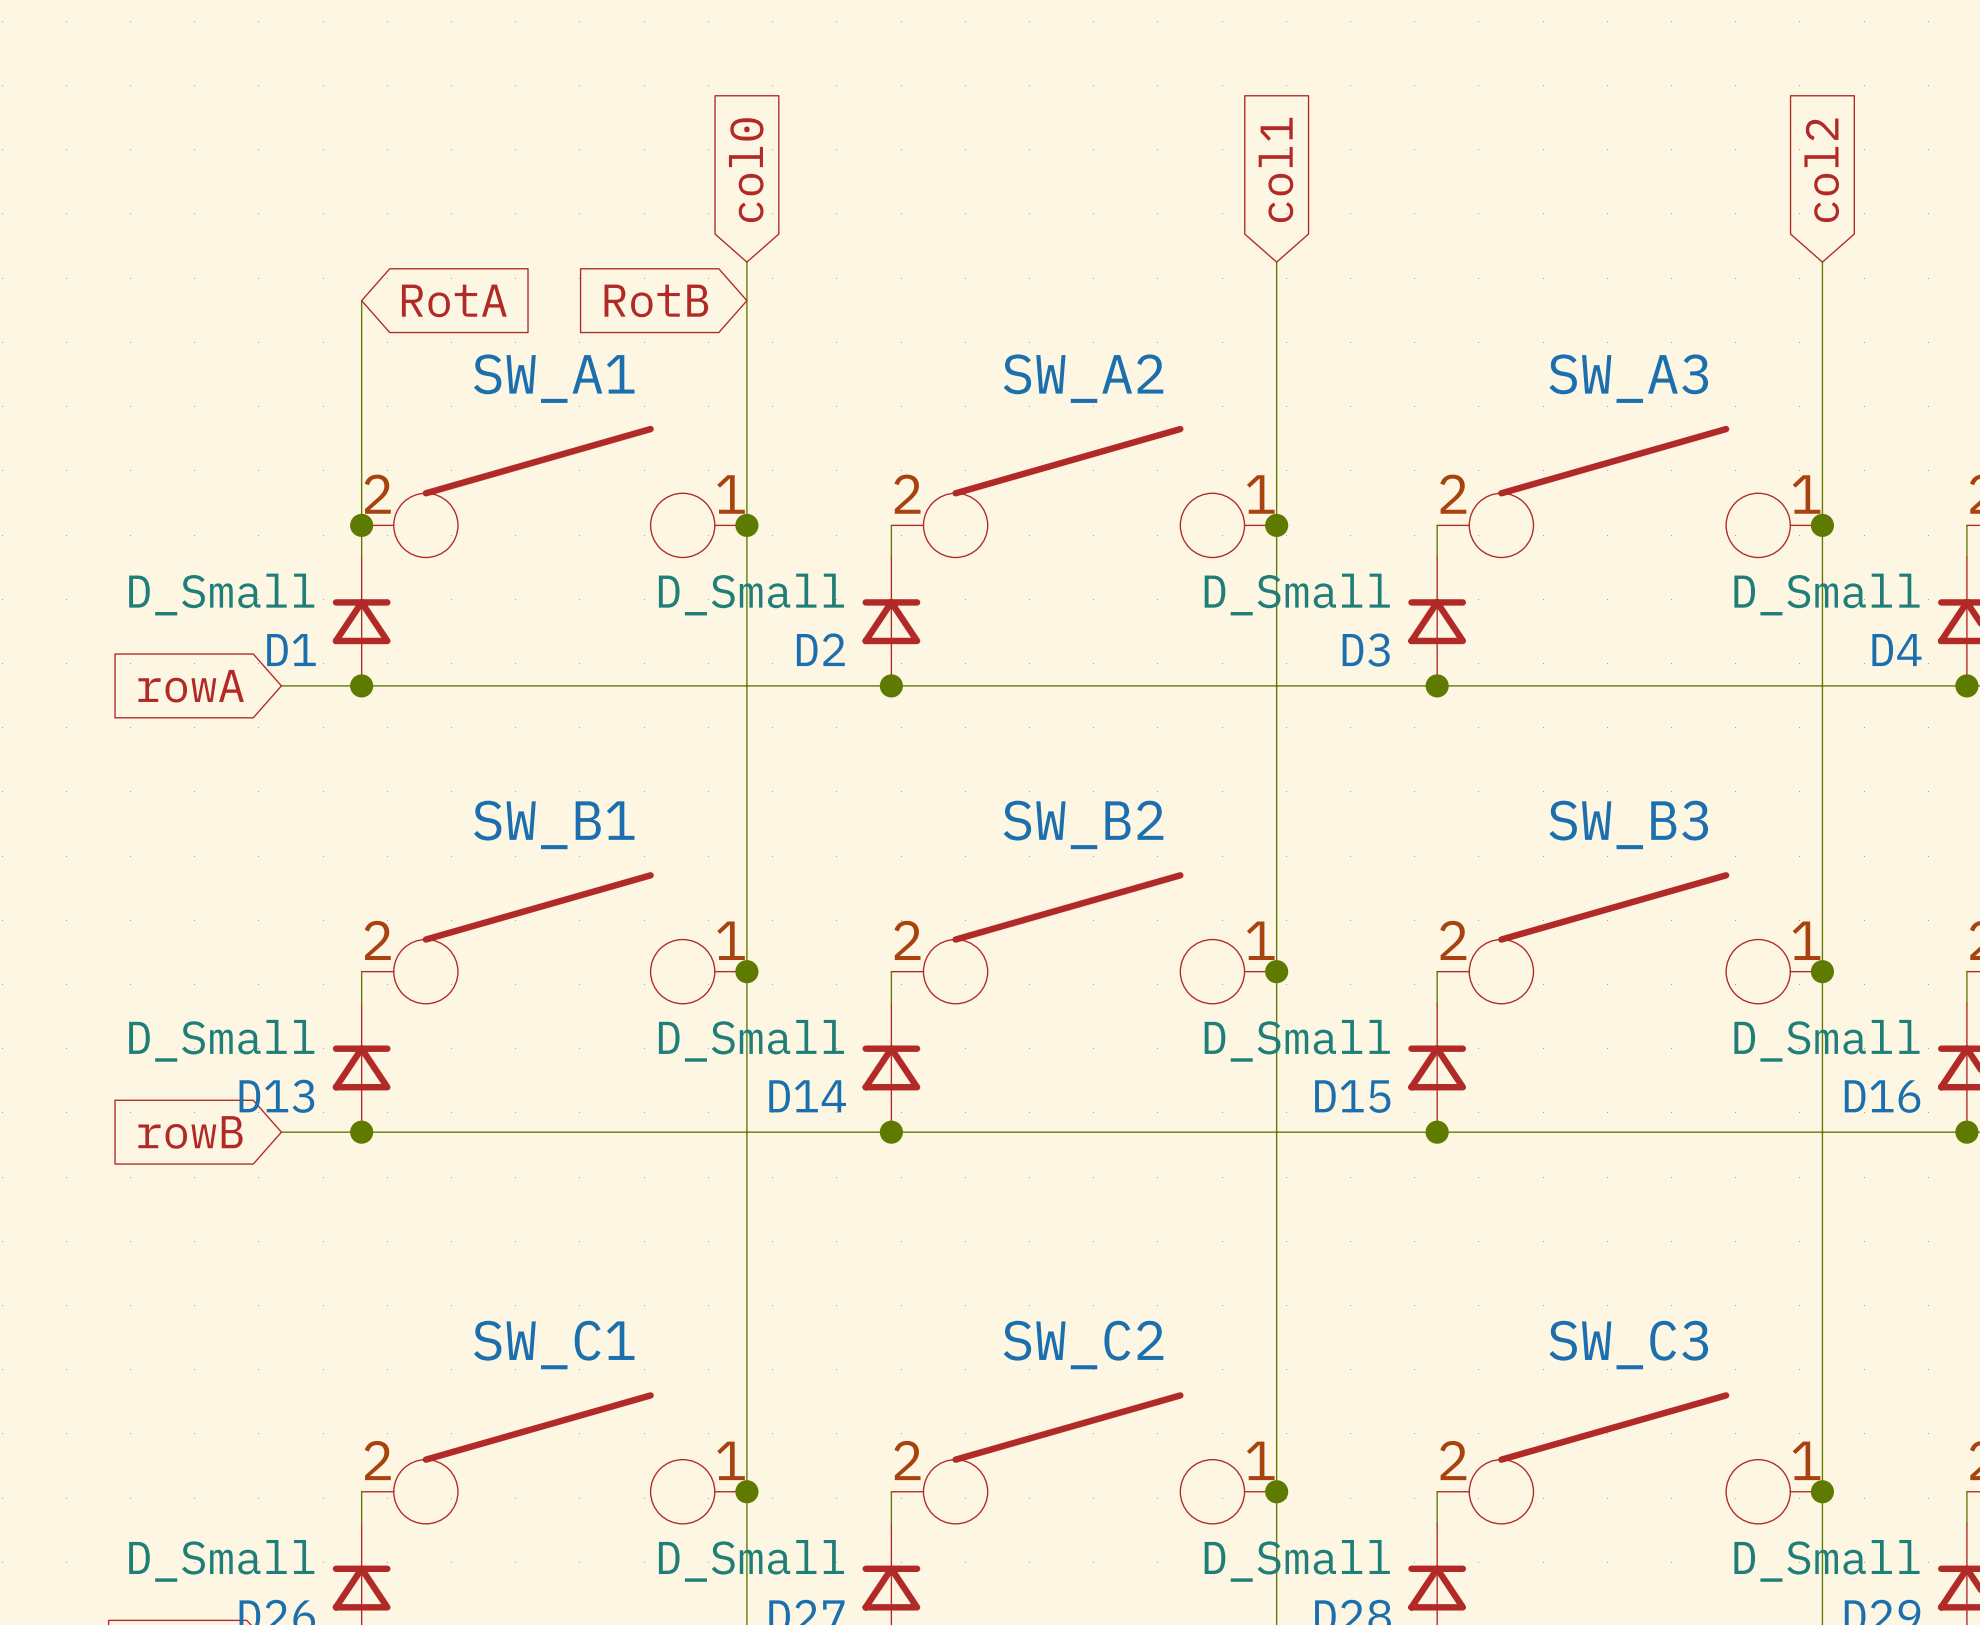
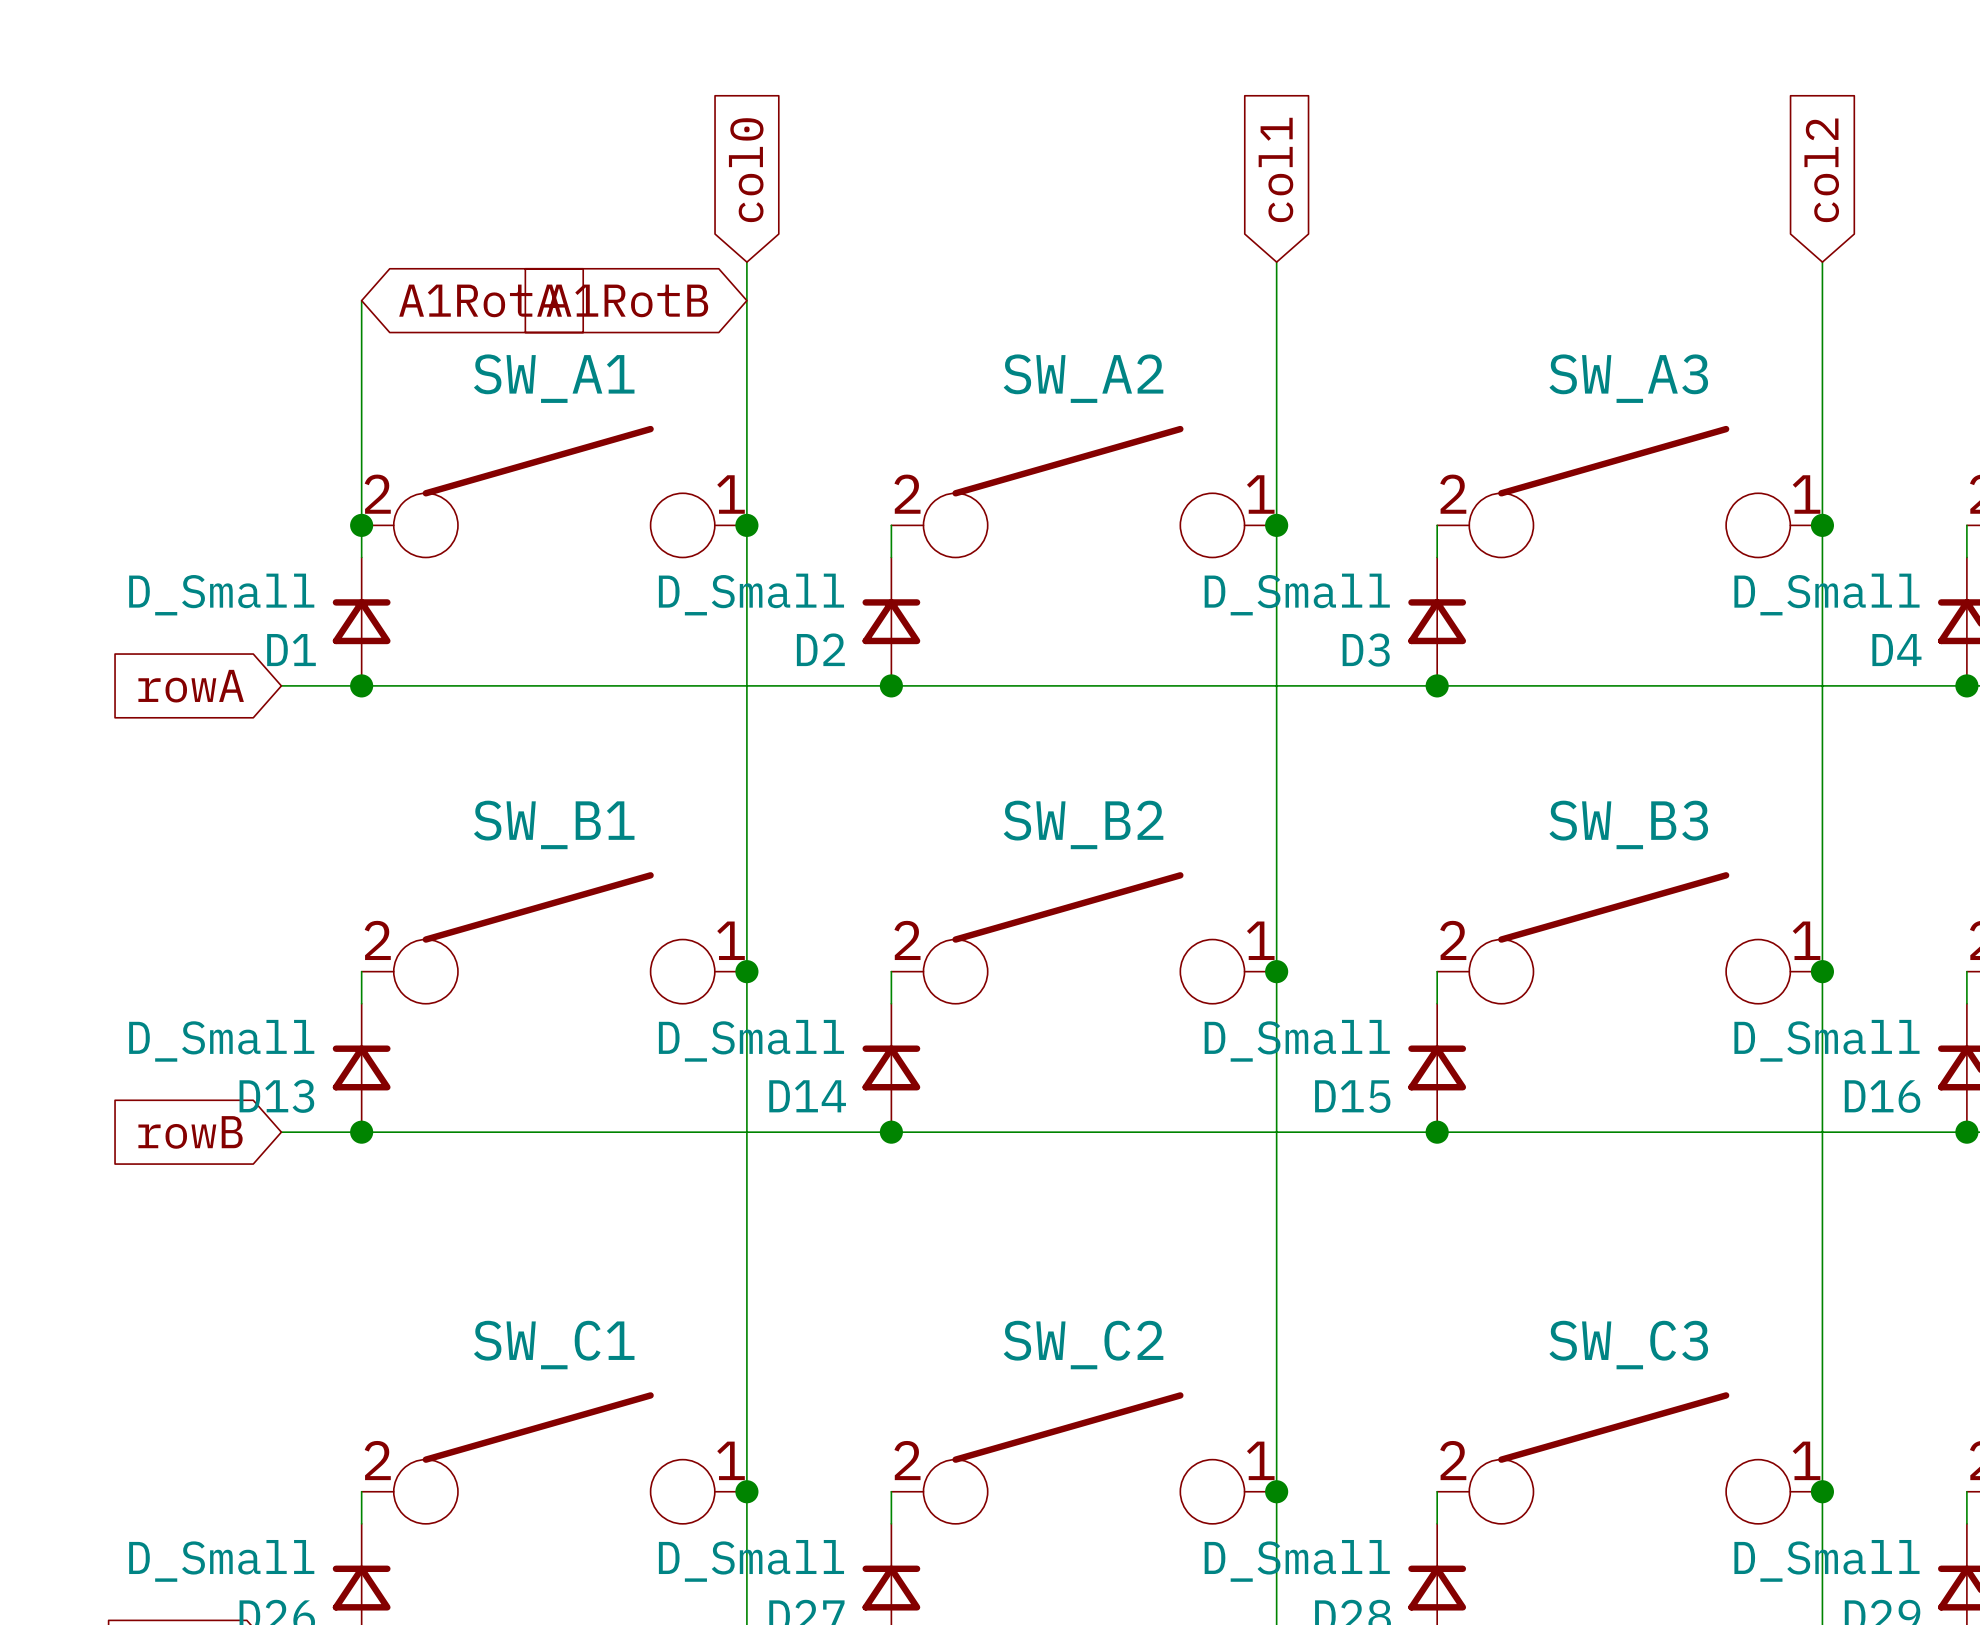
global label: RotA (454, 300) -> A1RotA (480, 300)
global label: RotB (656, 300) -> A1RotB (627, 300)

